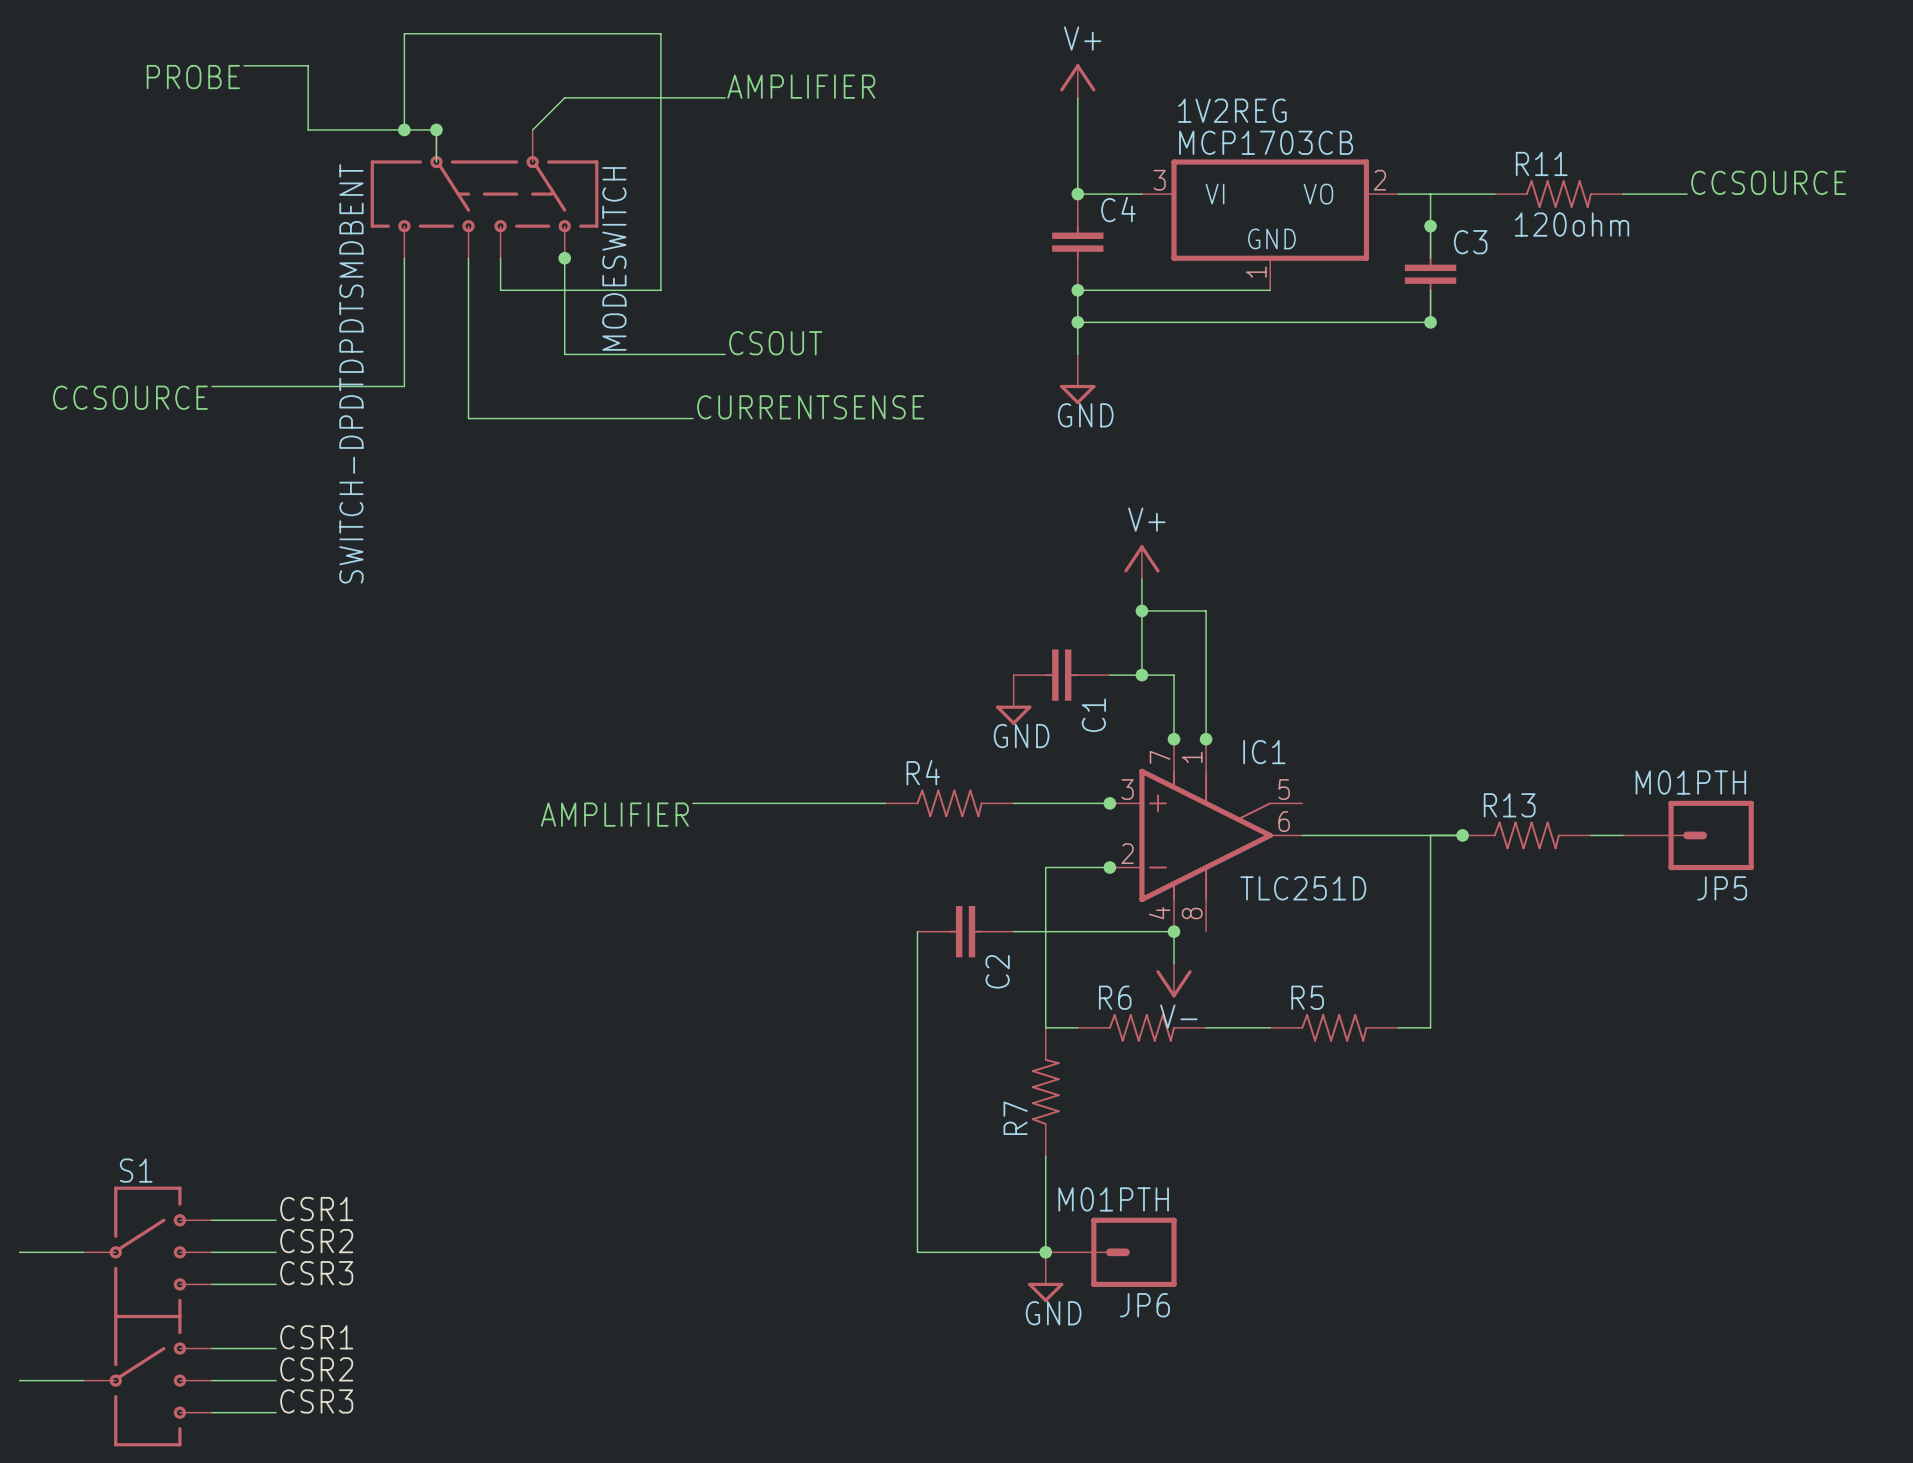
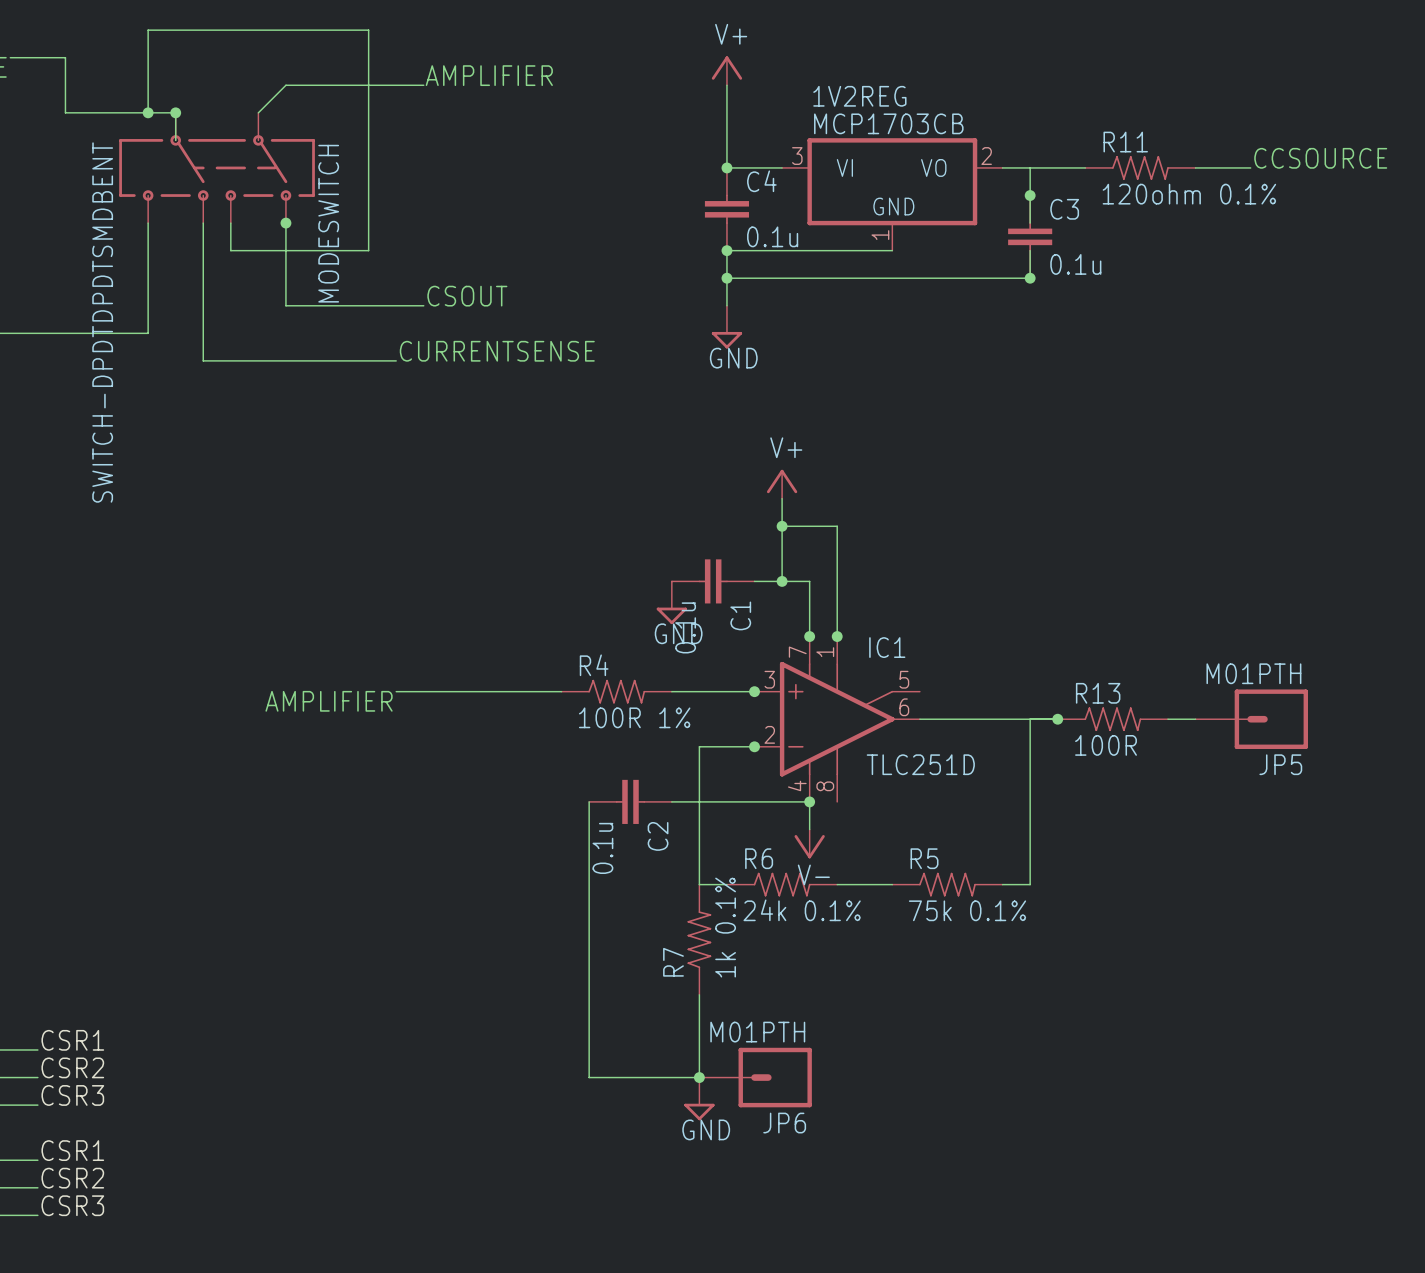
R11 value: 120ohm (1572, 224) -> 120ohm 0.1% (1189, 194)
C4 value: none -> 0.1u (772, 236)
C3 value: none -> 0.1u (1075, 264)
C1 value: none -> 0.1u (685, 627)
R4 value: none -> 100R 1% (634, 717)
R13 value: none -> 100R (1106, 745)
C2 value: none -> 0.1u (602, 848)
R6 value: none -> 24k 0.1% (802, 910)
R5 value: none -> 75k 0.1% (967, 910)
R7 value: none -> 1k 0.1% (725, 927)

